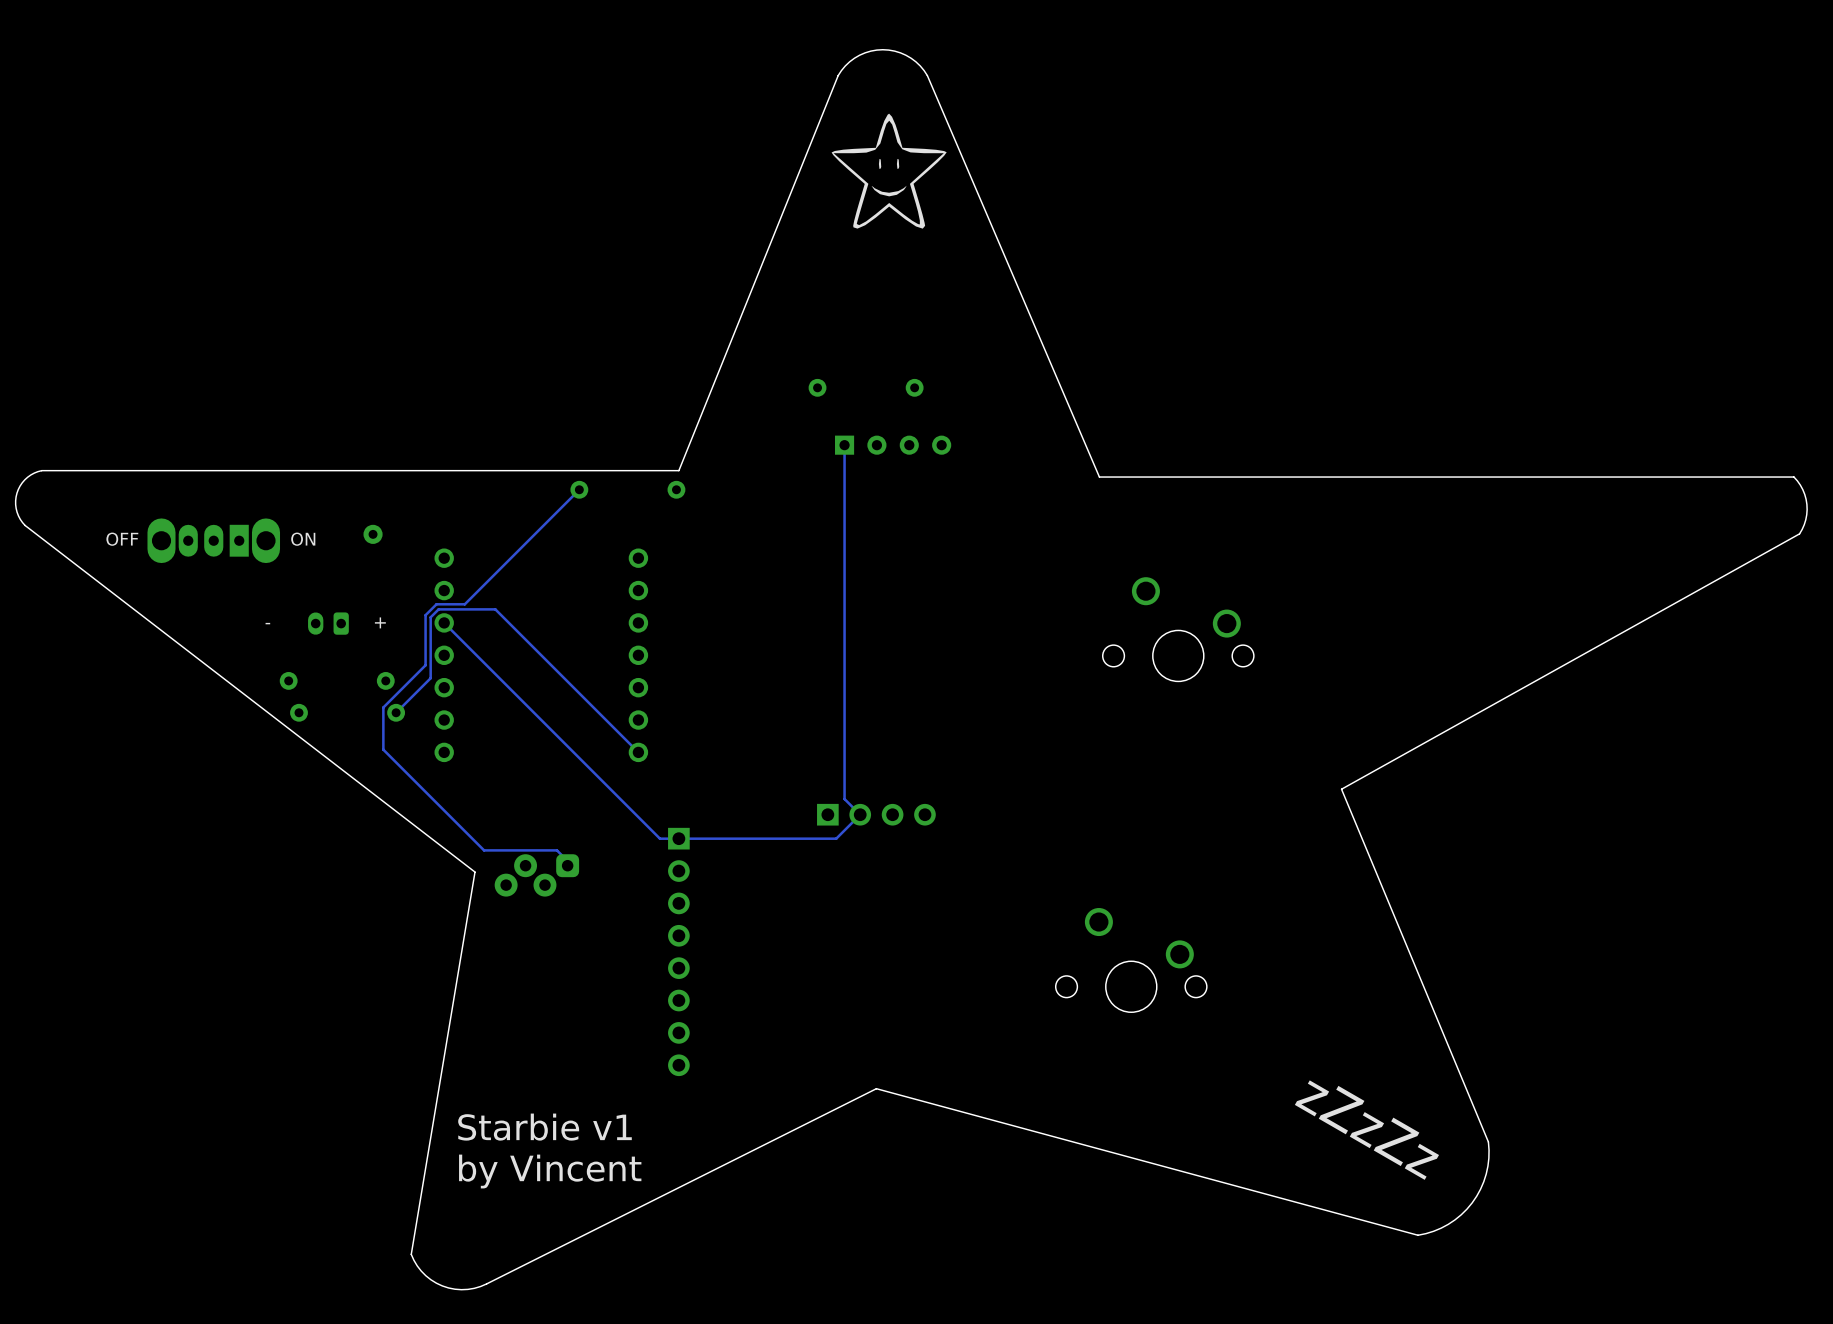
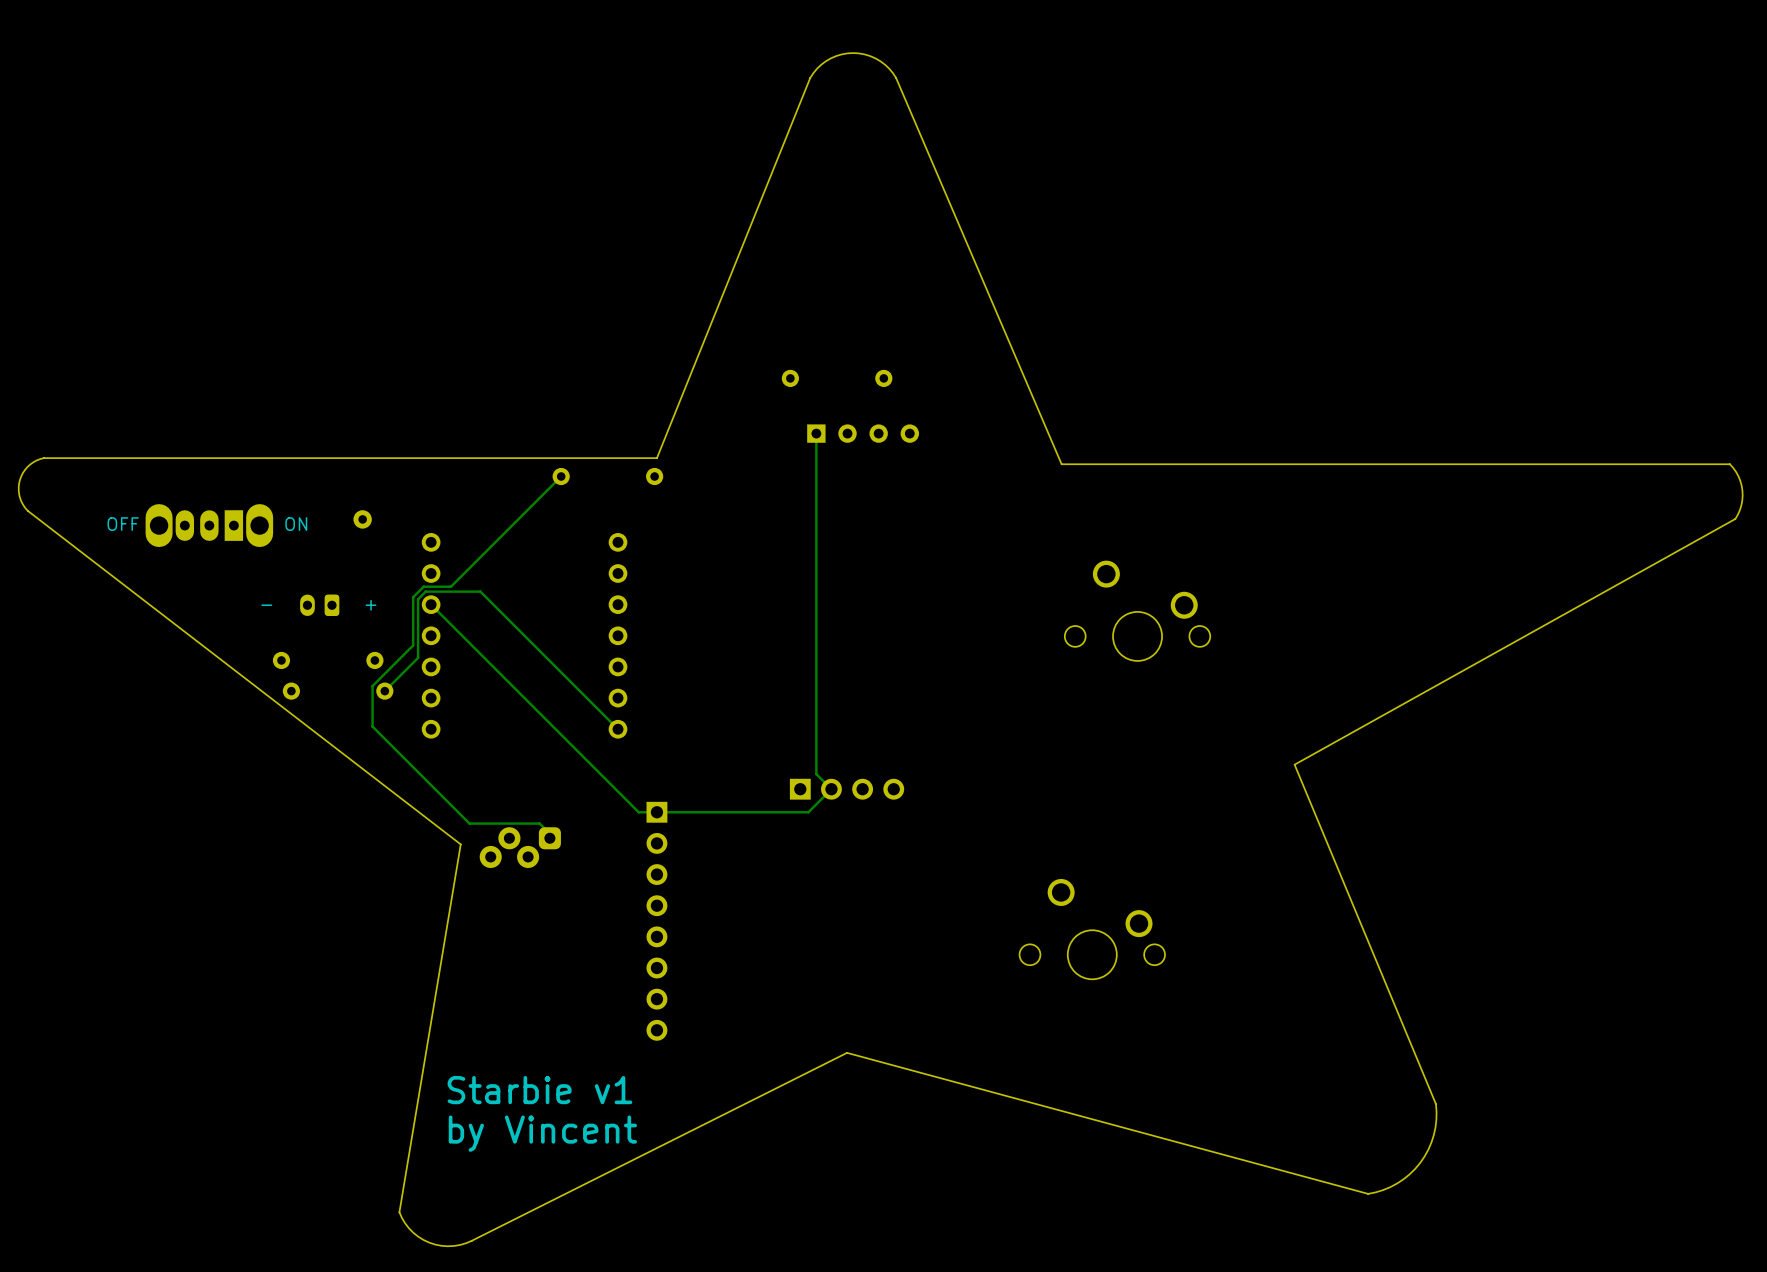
drawing: [831, 113, 947, 229] -> none
text: zZzZz (1366, 1130) -> none

